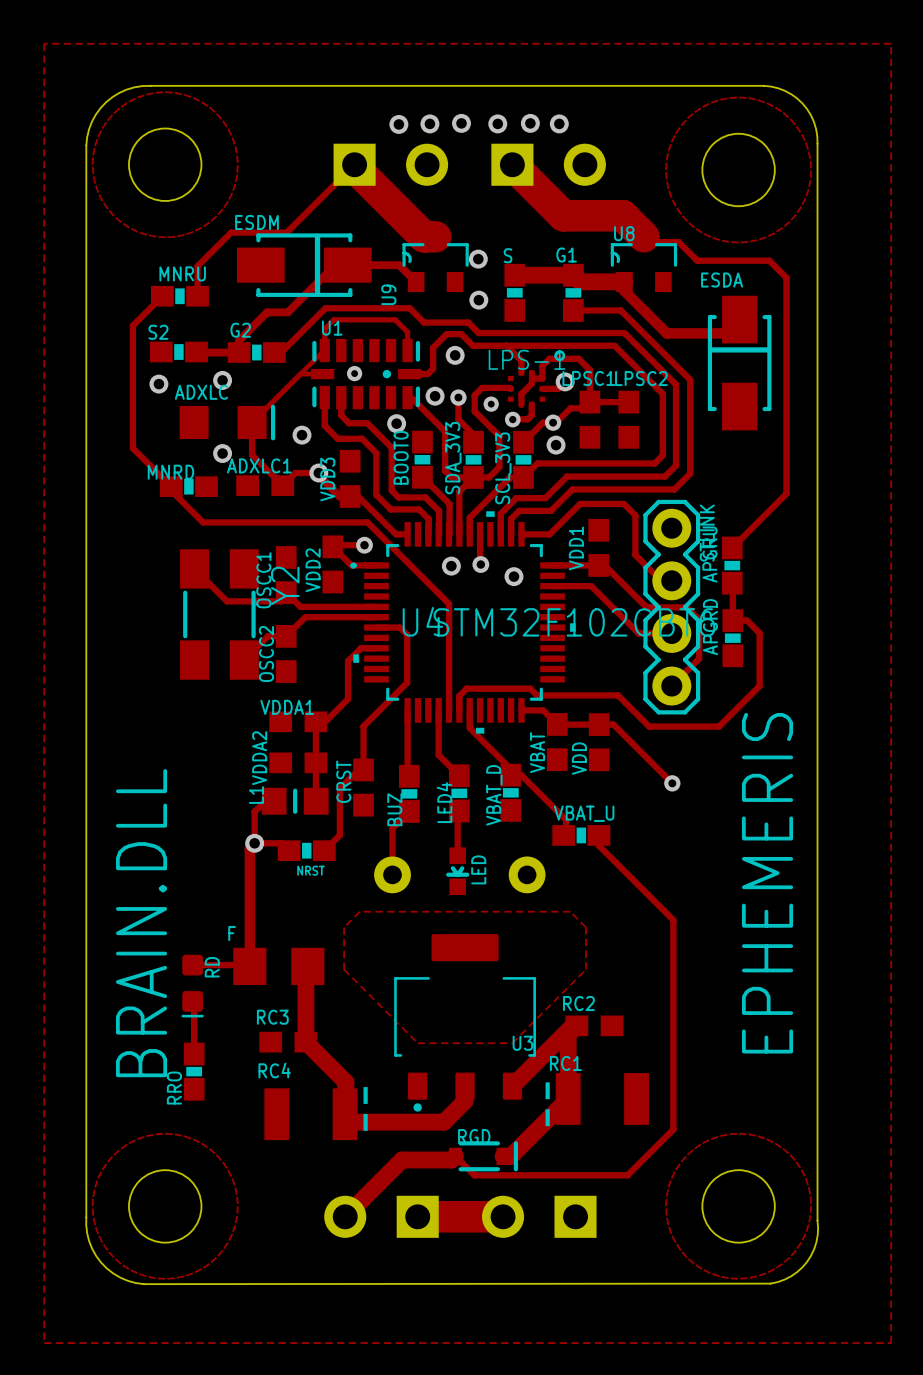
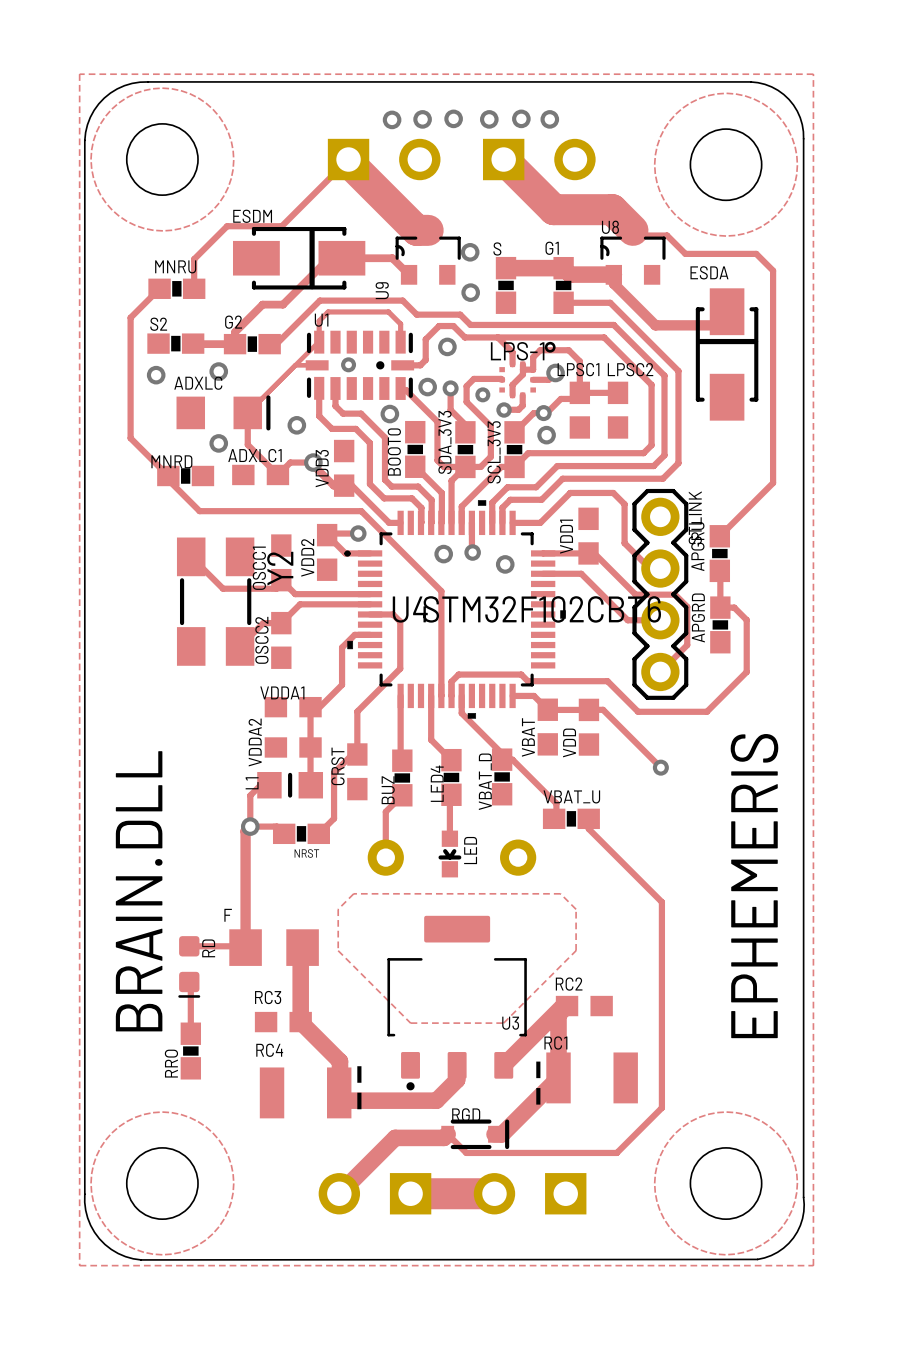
zone outline: (44, 43) (44, 1343) (891, 1343) (891, 43) (44, 43) -> (79, 74) (79, 1265) (813, 1265) (813, 74) (79, 74)

